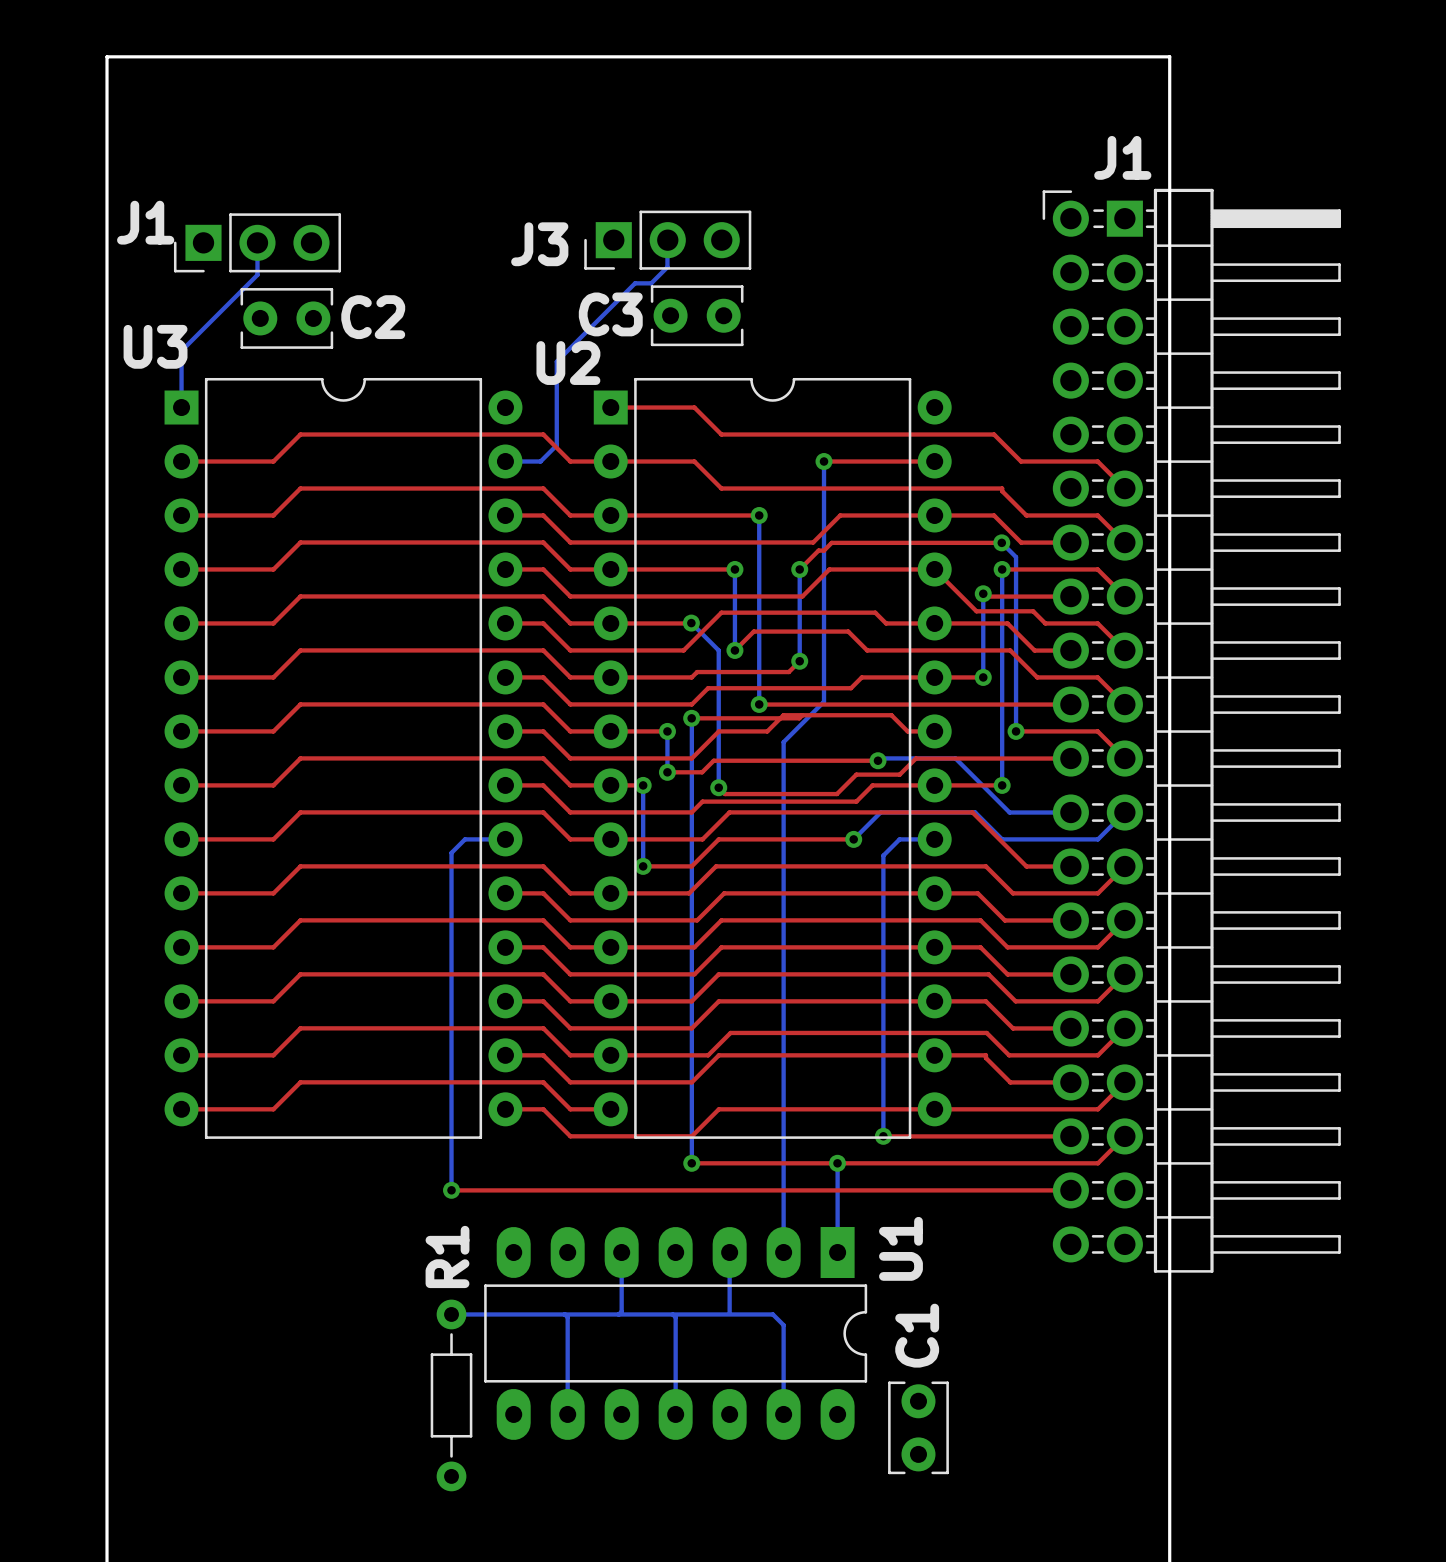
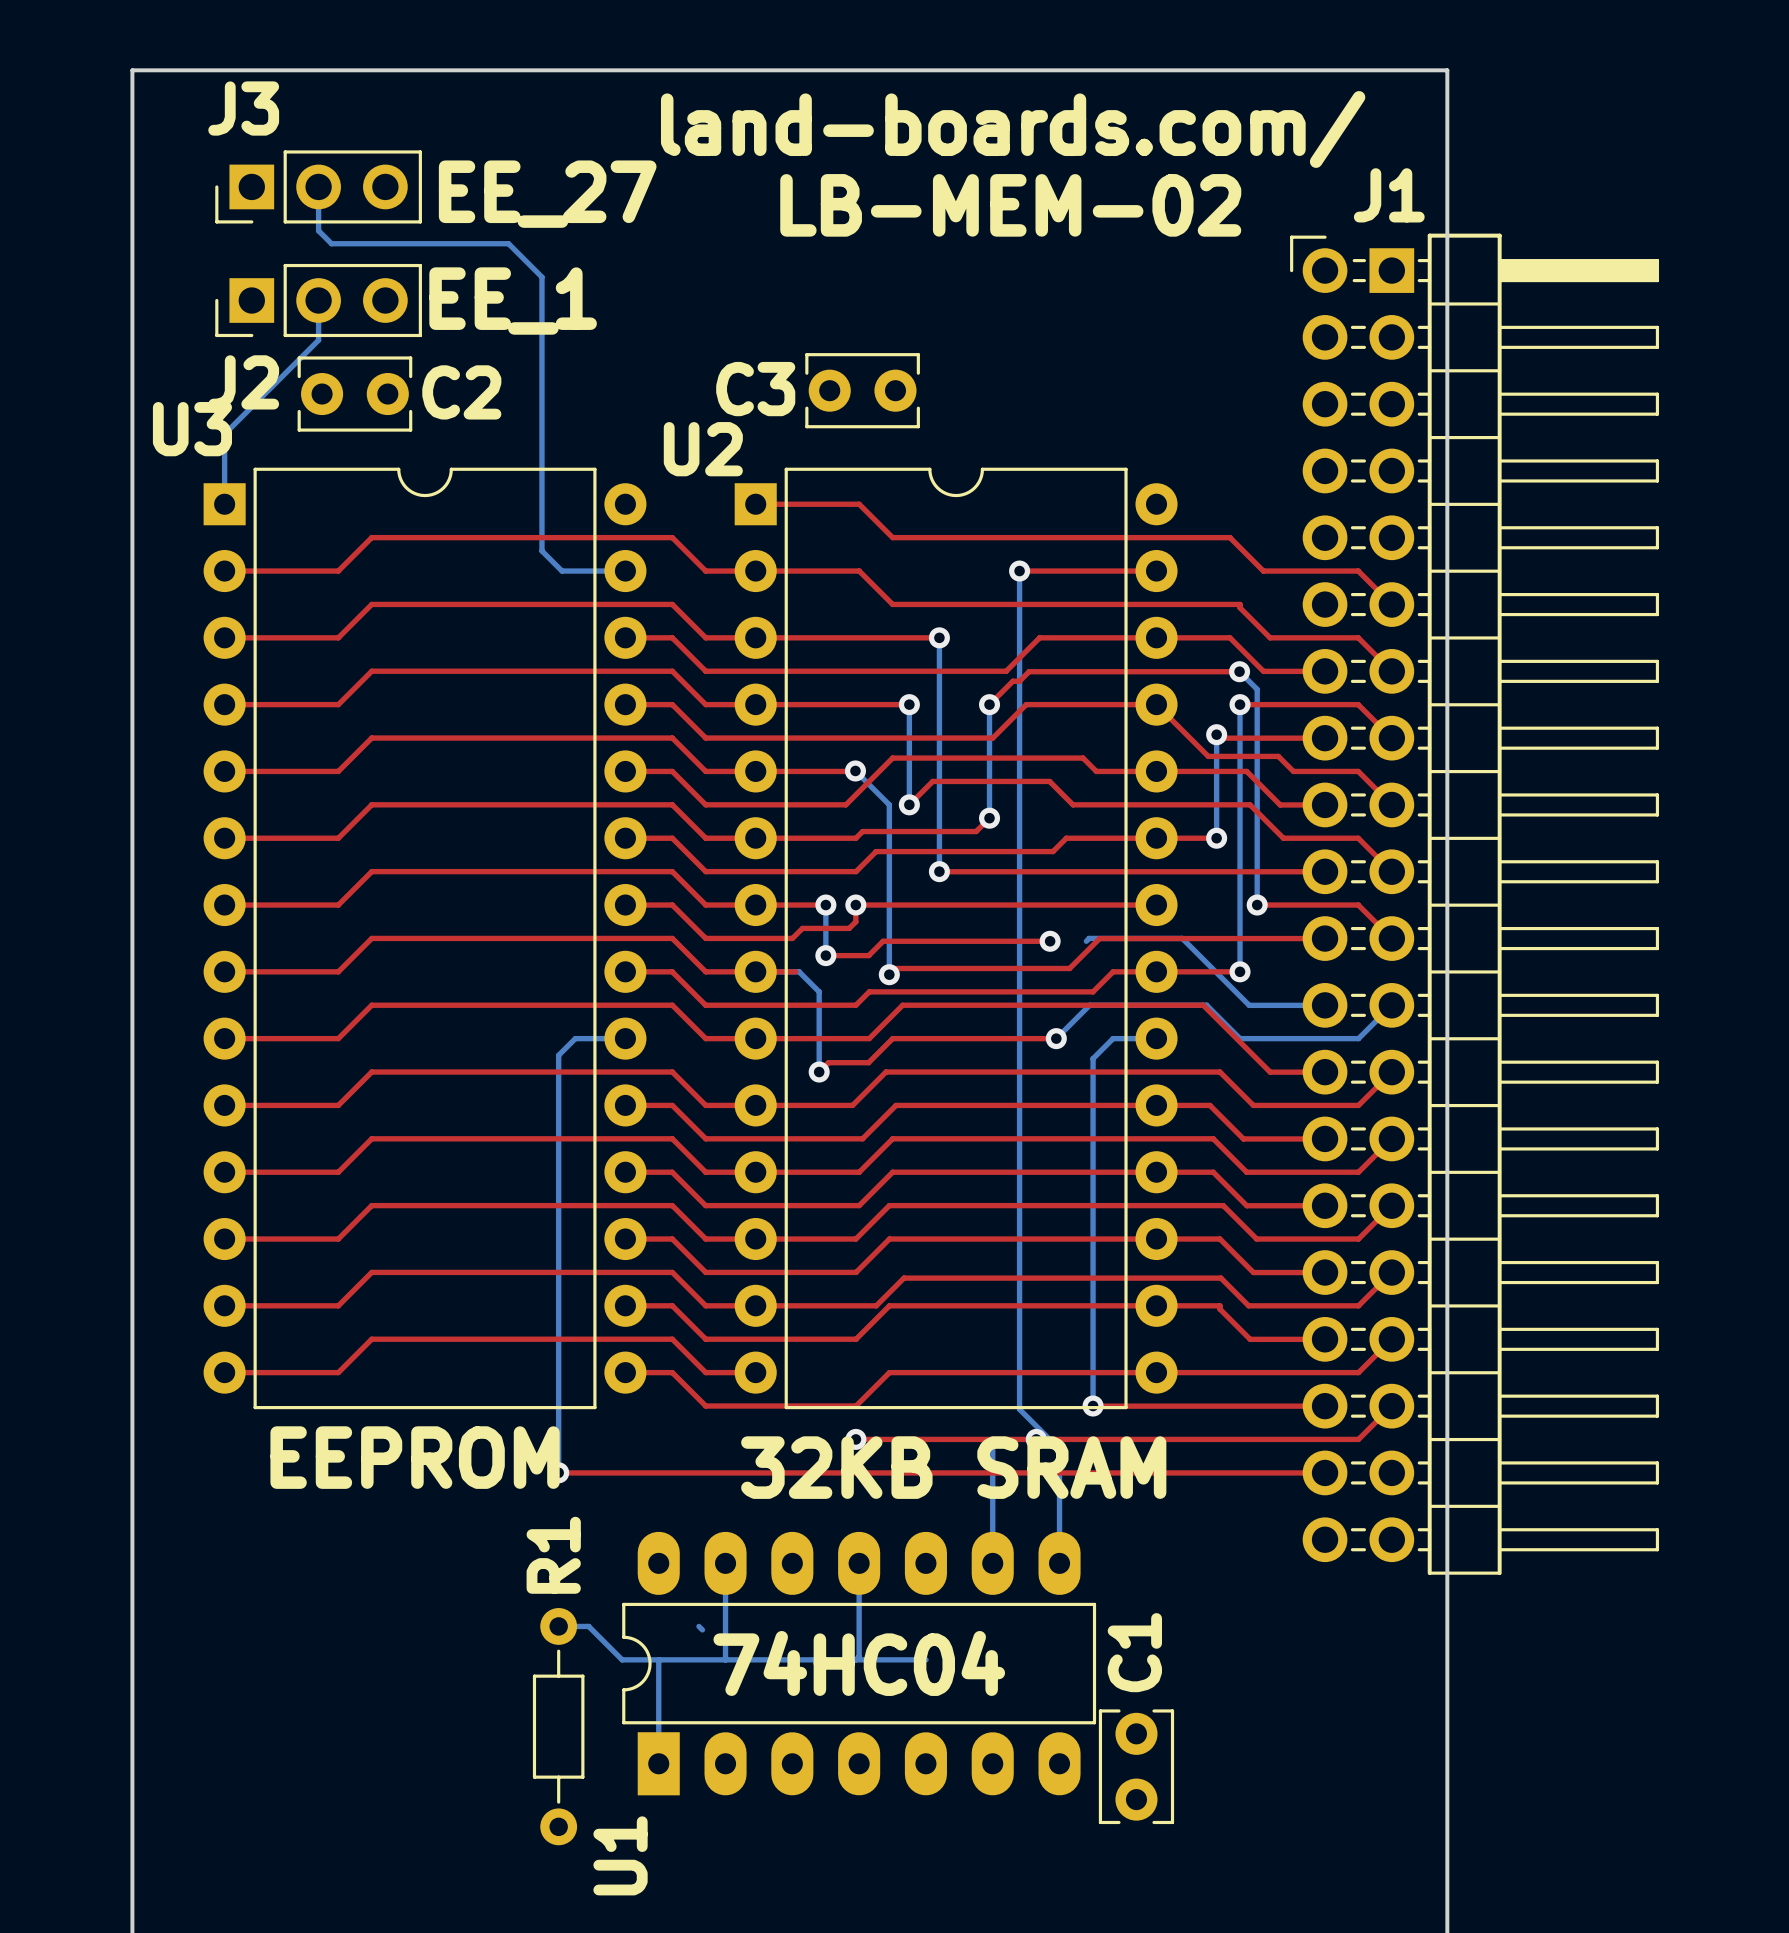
text: none -> land-boards.com/ (1013, 129)
text: none -> EE_27 (547, 194)
text: none -> LB-MEM-02 (1010, 205)
J1 name: J1 (145, 222) -> J2 (243, 382)
bottom track: (667, 240) (667, 267) (651, 283) (635, 283) (556, 361) (556, 445) (540, 461) (505, 461) -> (318, 186) (318, 230) (331, 243) (508, 243) (541, 277) (541, 551) (562, 571) (625, 571)
J3 position: (667, 240) -> (318, 186)
text: none -> EE_1 (513, 301)
J3 name position: J3 (539, 244) -> J3 (243, 108)
bottom track: (824, 701) (783, 742) (783, 1252) -> (1019, 868) (1019, 1409) (1059, 1449) (1059, 1563)
top track: (802, 715) (799, 718) (691, 718) -> none
bottom track: (691, 718) (691, 1163) -> none
via position: (691, 718) -> (855, 905)
top track: (718, 731) (691, 758) (640, 758) -> (889, 905) (855, 905) (855, 921) (849, 928) (802, 928) (792, 938)
top track: (767, 731) (783, 715) (891, 715) (907, 731) -> (949, 905) (1123, 905)
top track: (915, 758) (899, 774) (856, 774) (836, 794) (725, 794) (718, 787) -> (1133, 938) (1099, 938) (1069, 968) (889, 968)
top track: (848, 760) (878, 760) -> none
via position: (878, 760) -> (1050, 941)
bottom track: none -> (755, 971) (799, 971) (819, 991) (819, 1072)
bottom track: (643, 785) (643, 866) -> none
via: (643, 785) -> none
top track: (899, 785) (872, 785) (856, 801) -> (1113, 971) (1093, 991) (1059, 991)
top track: (721, 839) (718, 839) (691, 866) (643, 866) -> (892, 1038) (868, 1062) (828, 1062) (819, 1072)
via position: (643, 866) -> (819, 1072)
bottom track: none -> (992, 1439) (992, 1563)
bottom track: (837, 1163) (837, 1252) -> none
text: none -> EEPROM (415, 1457)
text: none -> 32KB SRAM (953, 1467)
U1 name position: U1 (900, 1248) -> U1 (620, 1855)
bottom track: (621, 1252) (621, 1311) (618, 1314) -> none
bottom track: (729, 1252) (729, 1311) -> none
bottom track: none -> (725, 1563) (725, 1659)
bottom track: none -> (859, 1563) (859, 1656) (855, 1659)
bottom track: (475, 1314) (772, 1314) (783, 1325) (783, 1414) -> (588, 1626) (622, 1659) (926, 1659)
bottom track: (672, 1314) (675, 1317) (675, 1414) -> none
bottom track: (567, 1317) (567, 1414) -> none
U1 rotation: 0° (675, 1333) -> 180° (859, 1663)
bottom track: none -> (658, 1659) (658, 1763)
text: none -> 74HC04 (859, 1663)

